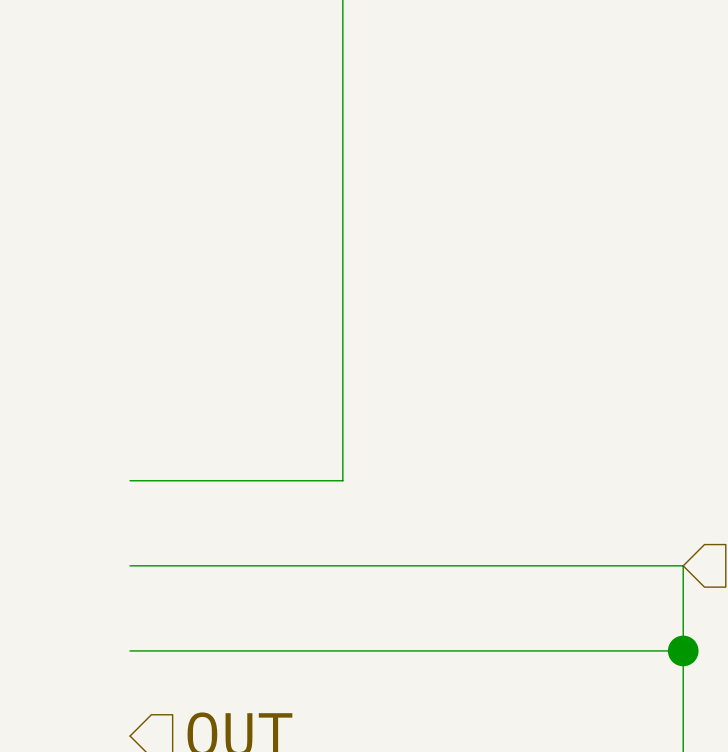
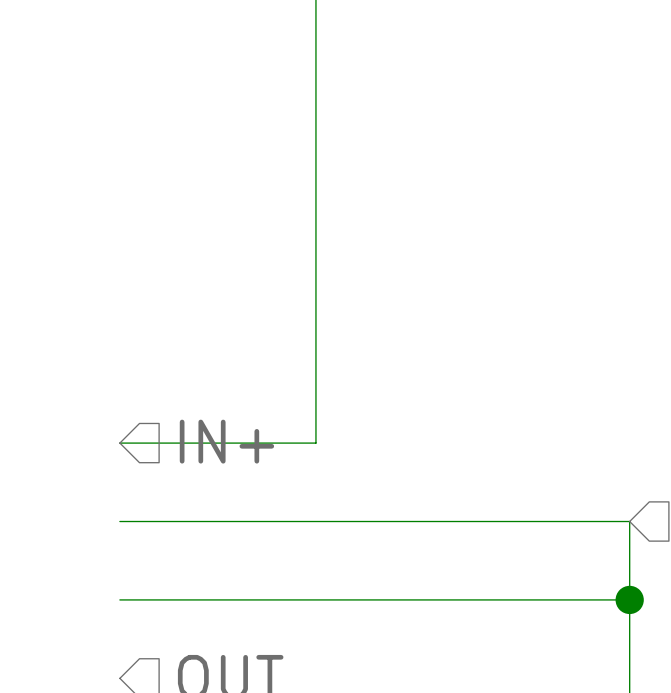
hierarchical label: none -> IN+ (226, 441)

